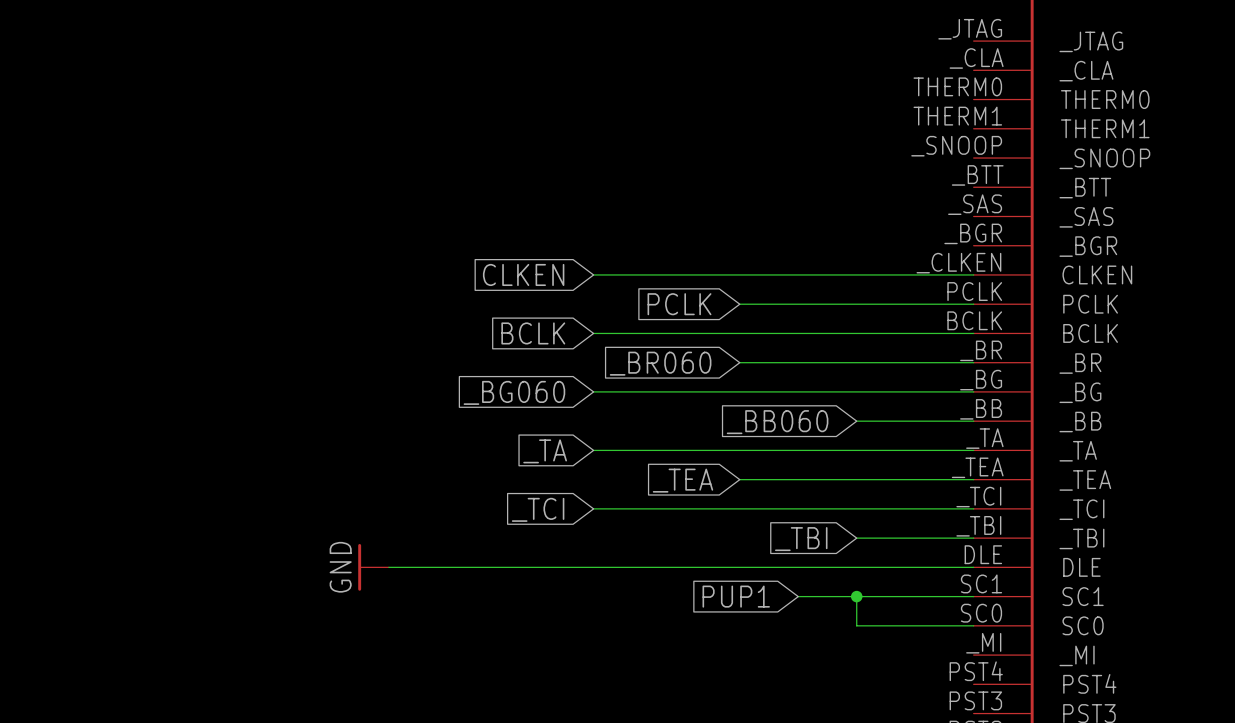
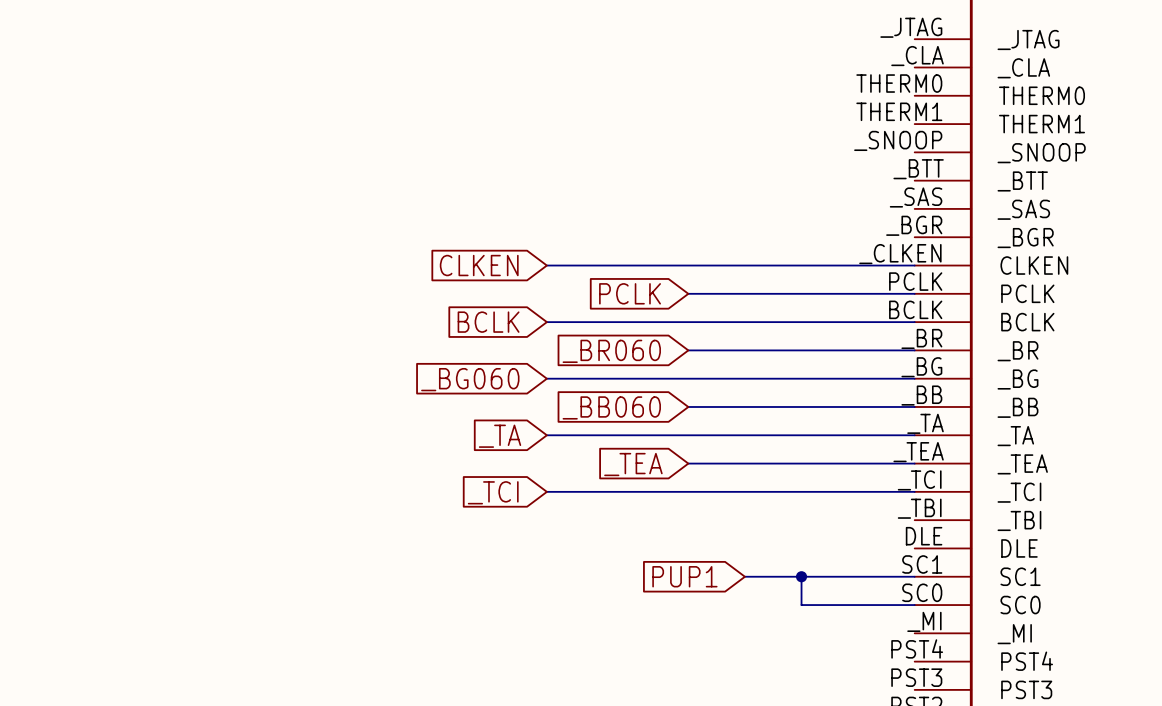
global label position: _BB060 (777, 422) -> _BB060 (611, 407)
wire: (856, 538) (973, 538) -> (688, 406) (801, 406)
global label: _TBI (801, 539) -> none
power symbol: GND (373, 567) -> none
wire: (388, 567) (973, 567) -> none

